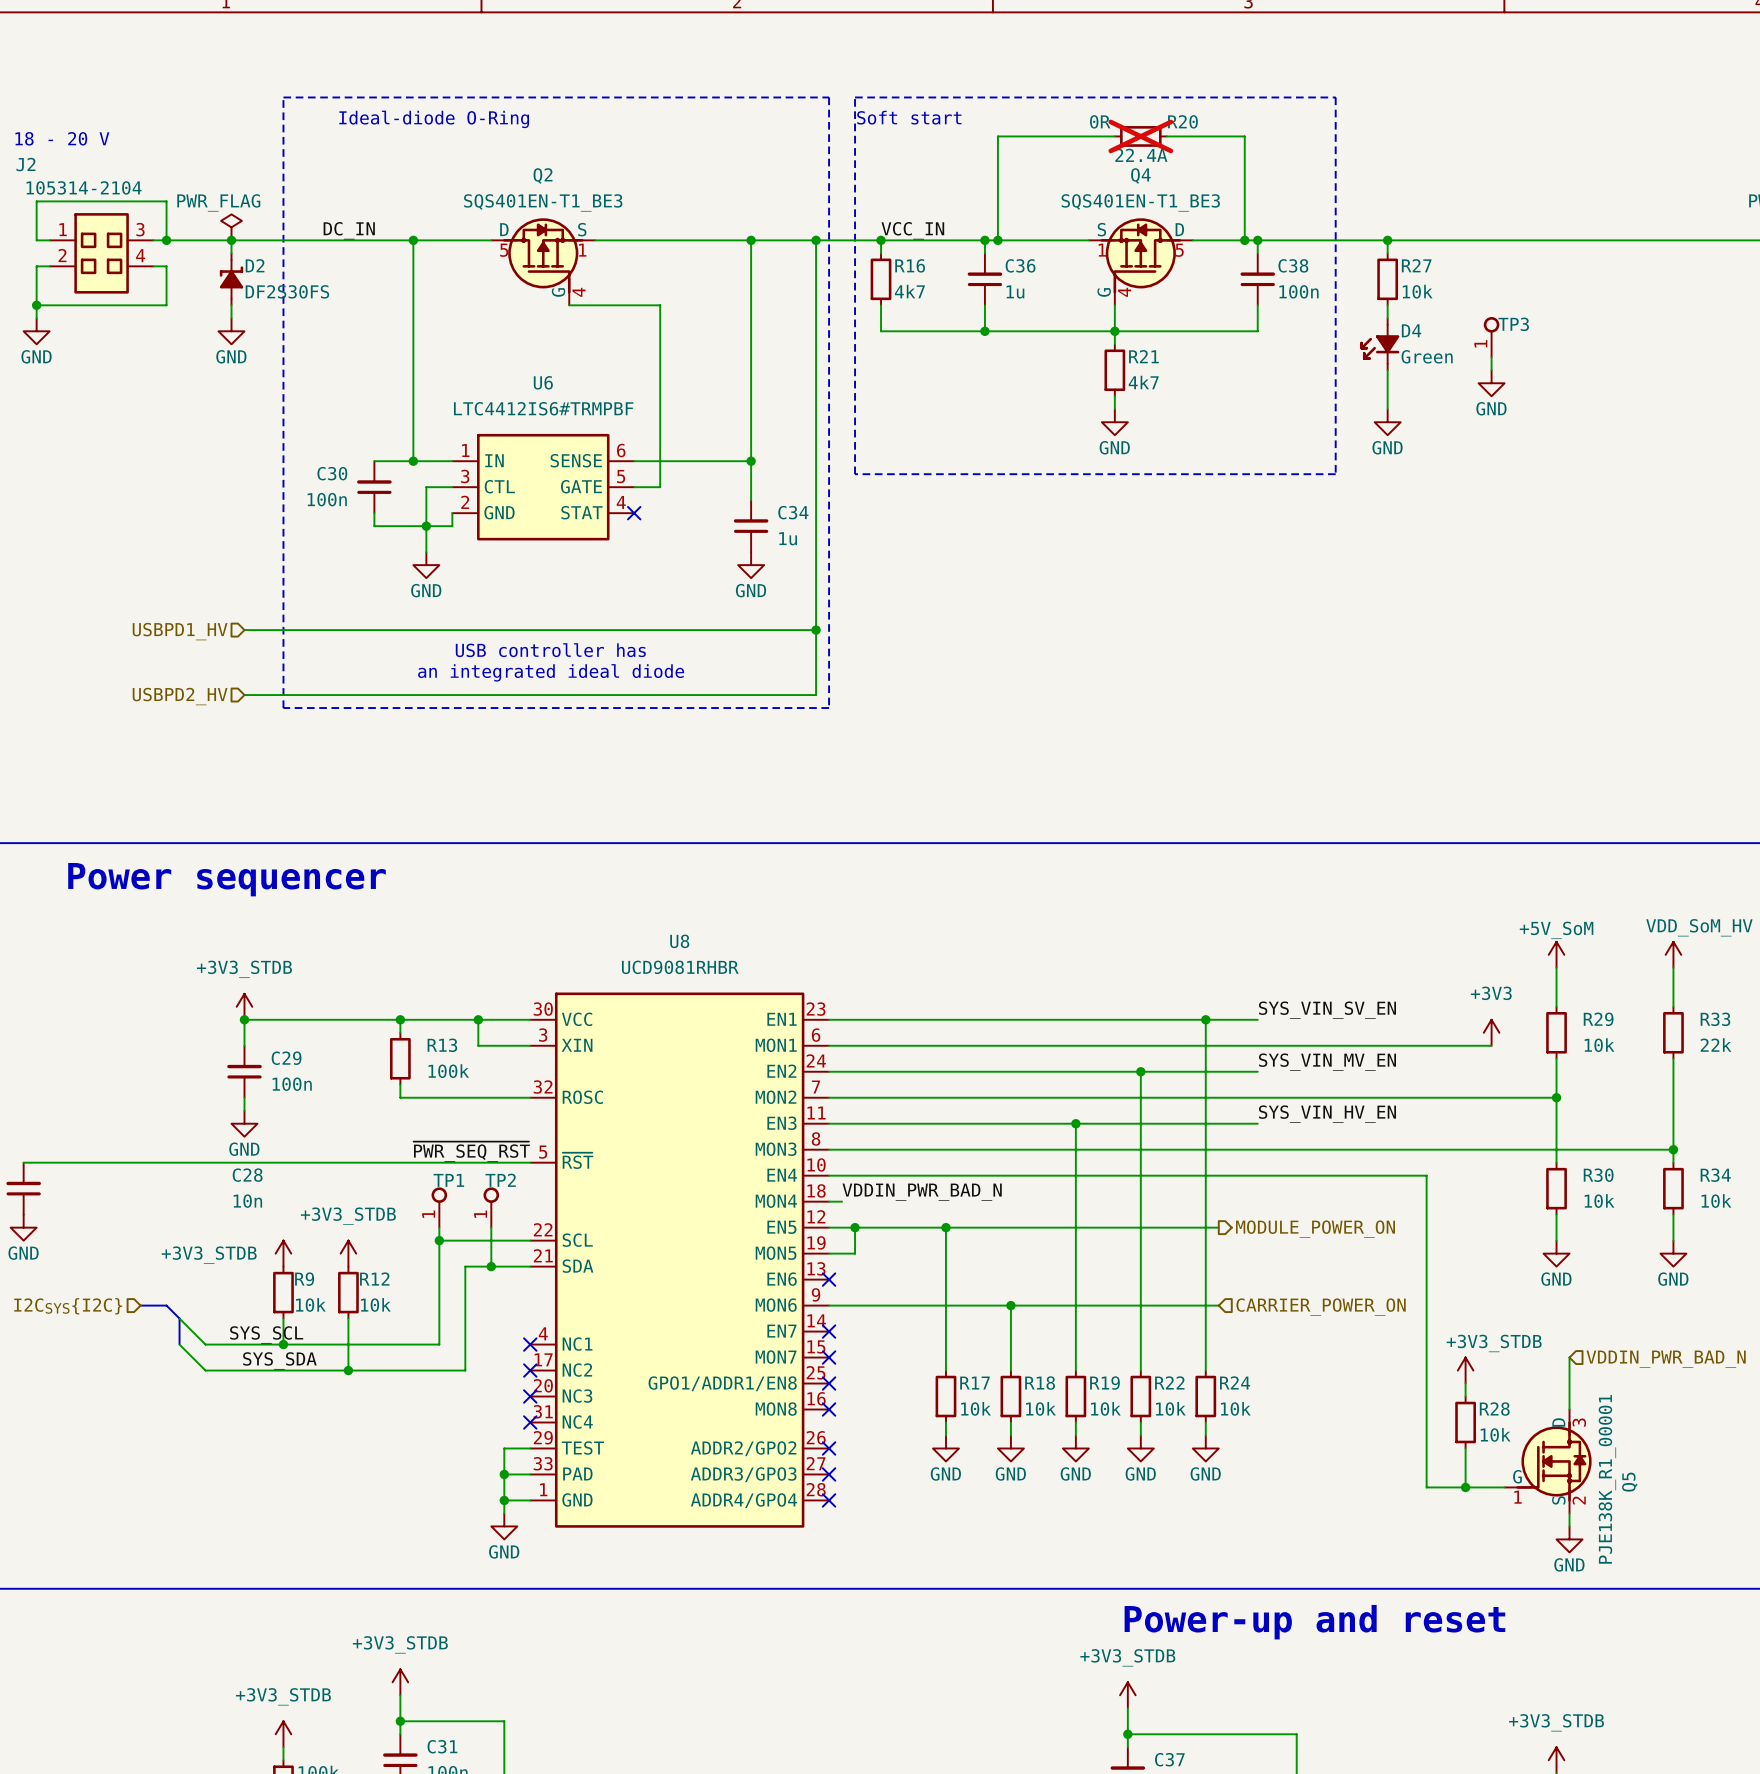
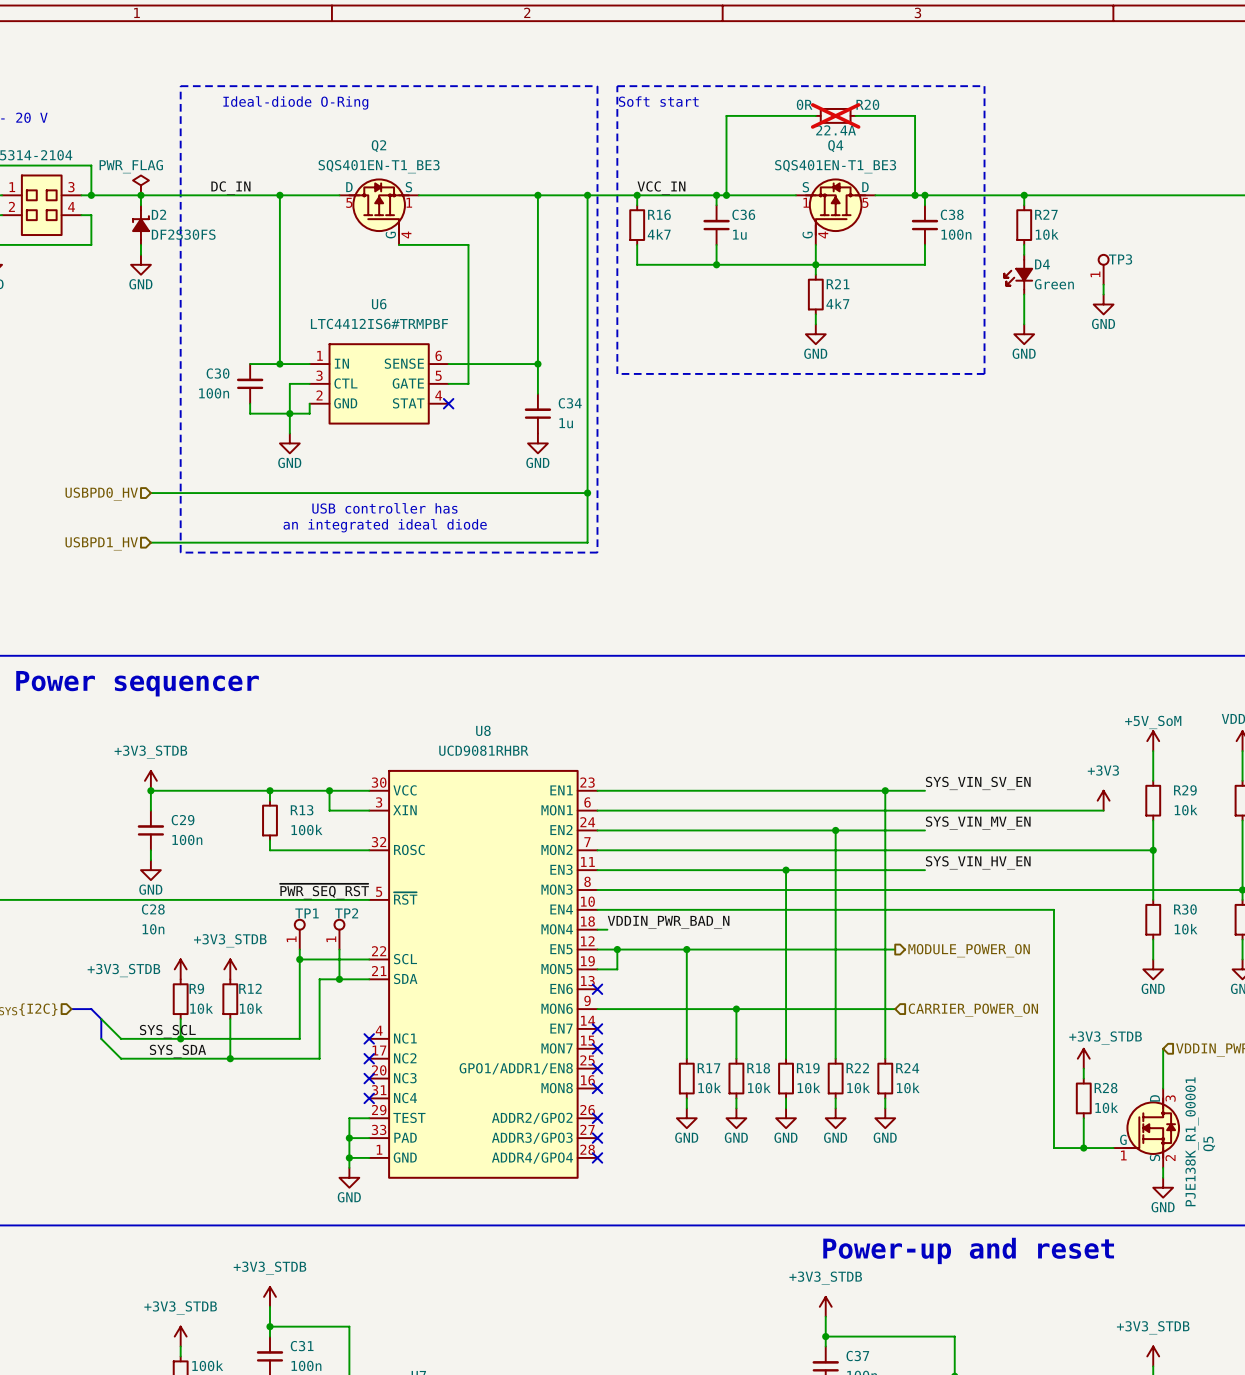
hierarchical label: USBPD1_HV (180, 631) -> USBPD0_HV (101, 494)
hierarchical label: USBPD2_HV (180, 696) -> USBPD1_HV (101, 543)

